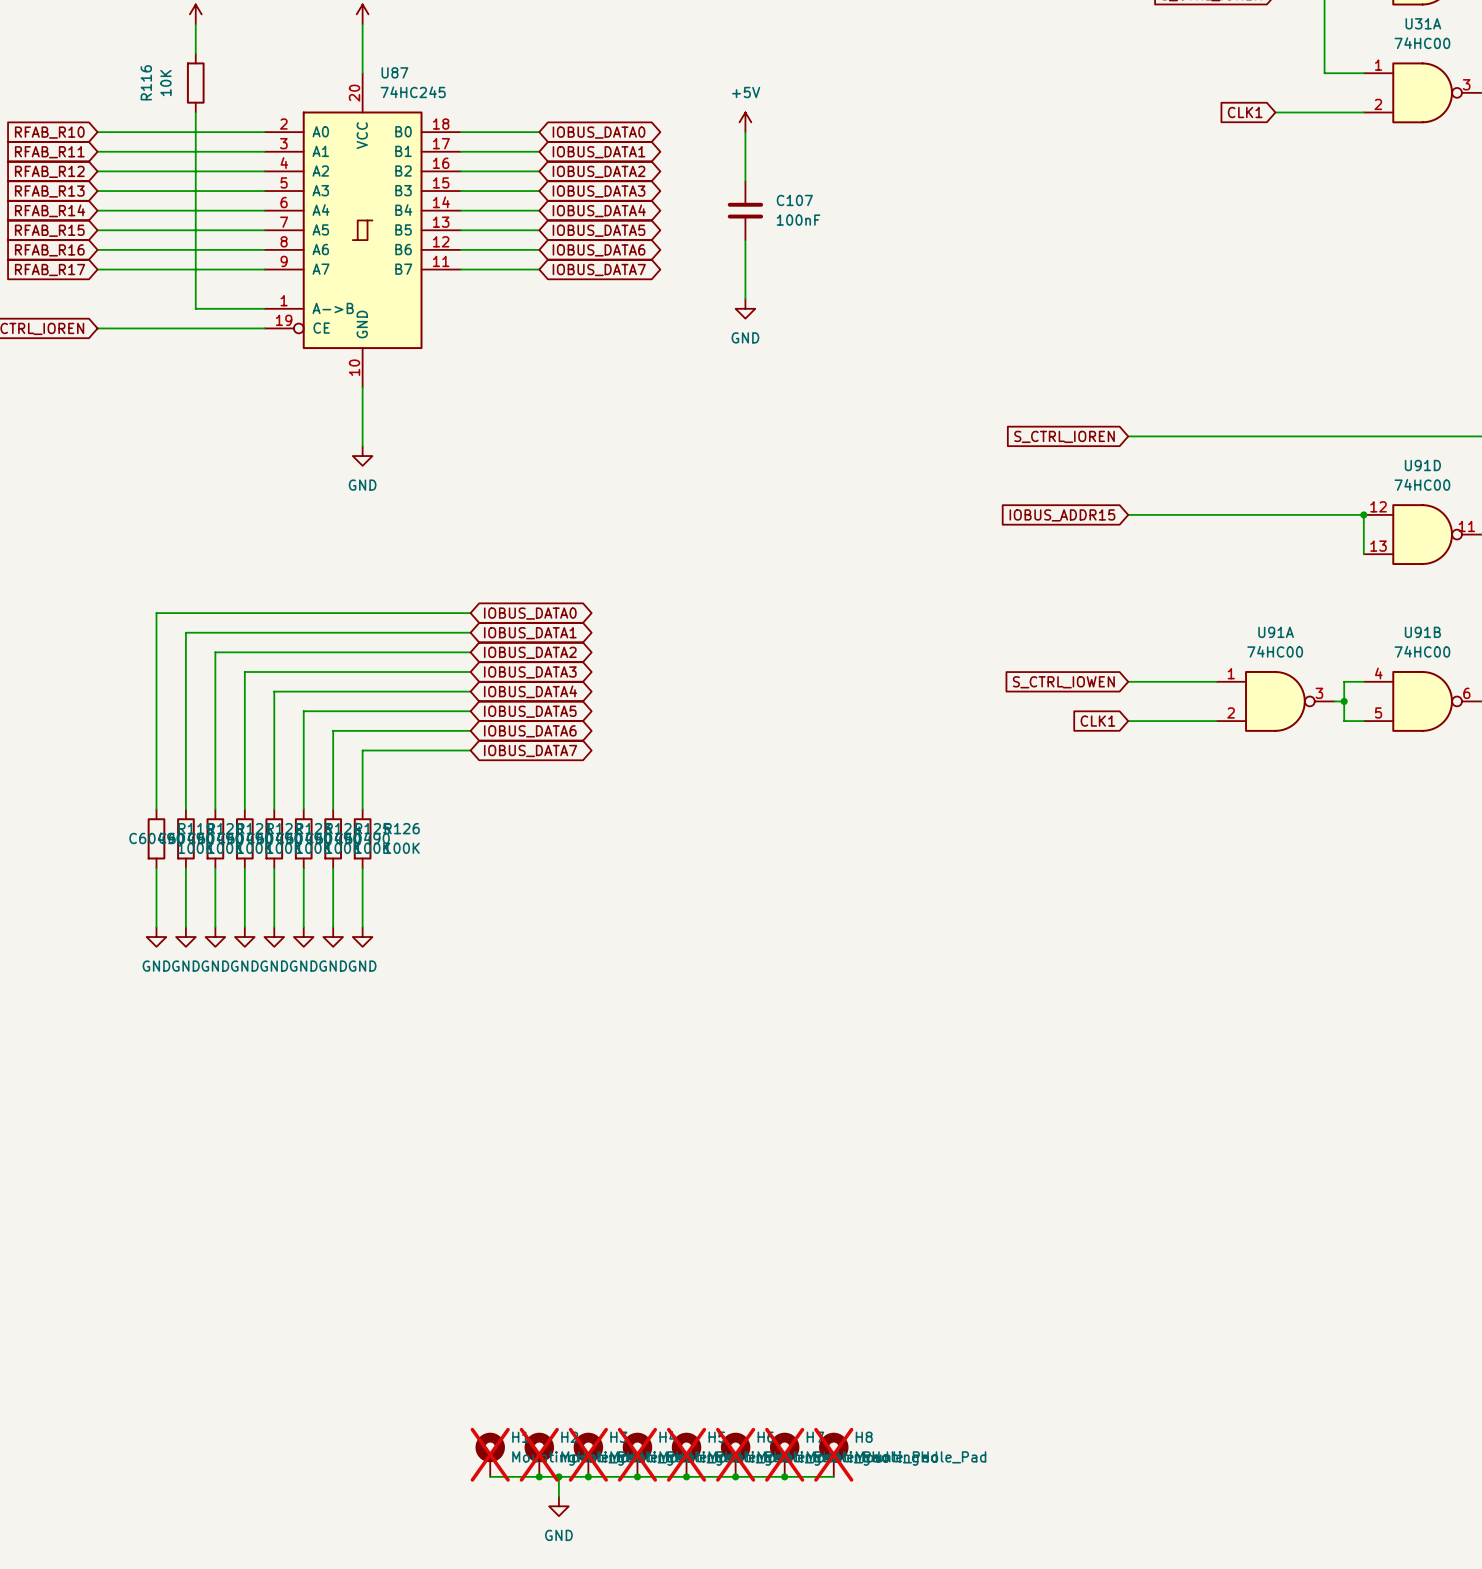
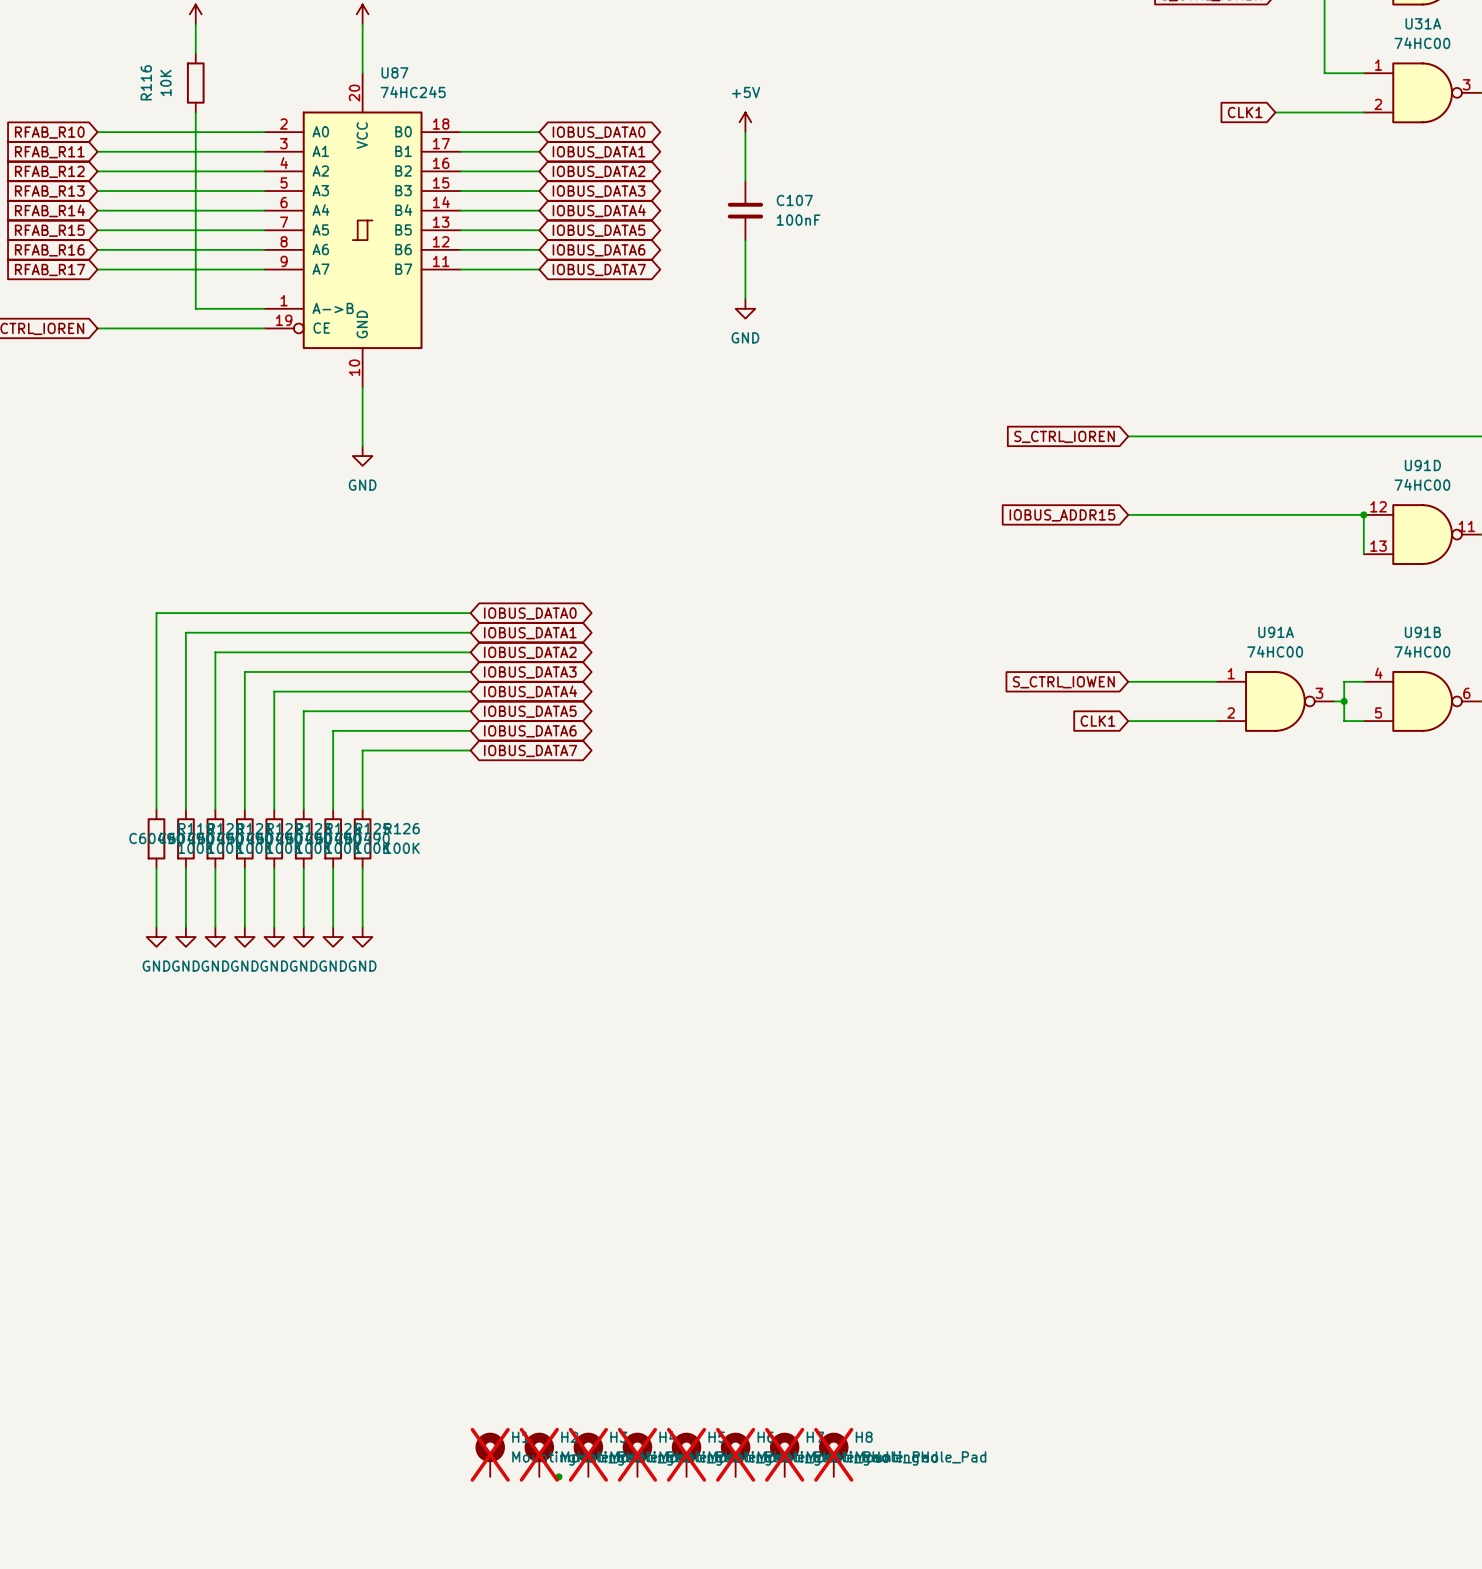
wire: (490, 1476) (833, 1476) -> none
junction: (539, 1476) -> none
wire: (558, 1476) (558, 1496) -> none
junction: (588, 1476) -> none
junction: (637, 1476) -> none
junction: (686, 1476) -> none
junction: (735, 1476) -> none
junction: (784, 1476) -> none
power symbol: GND (558, 1506) -> none

